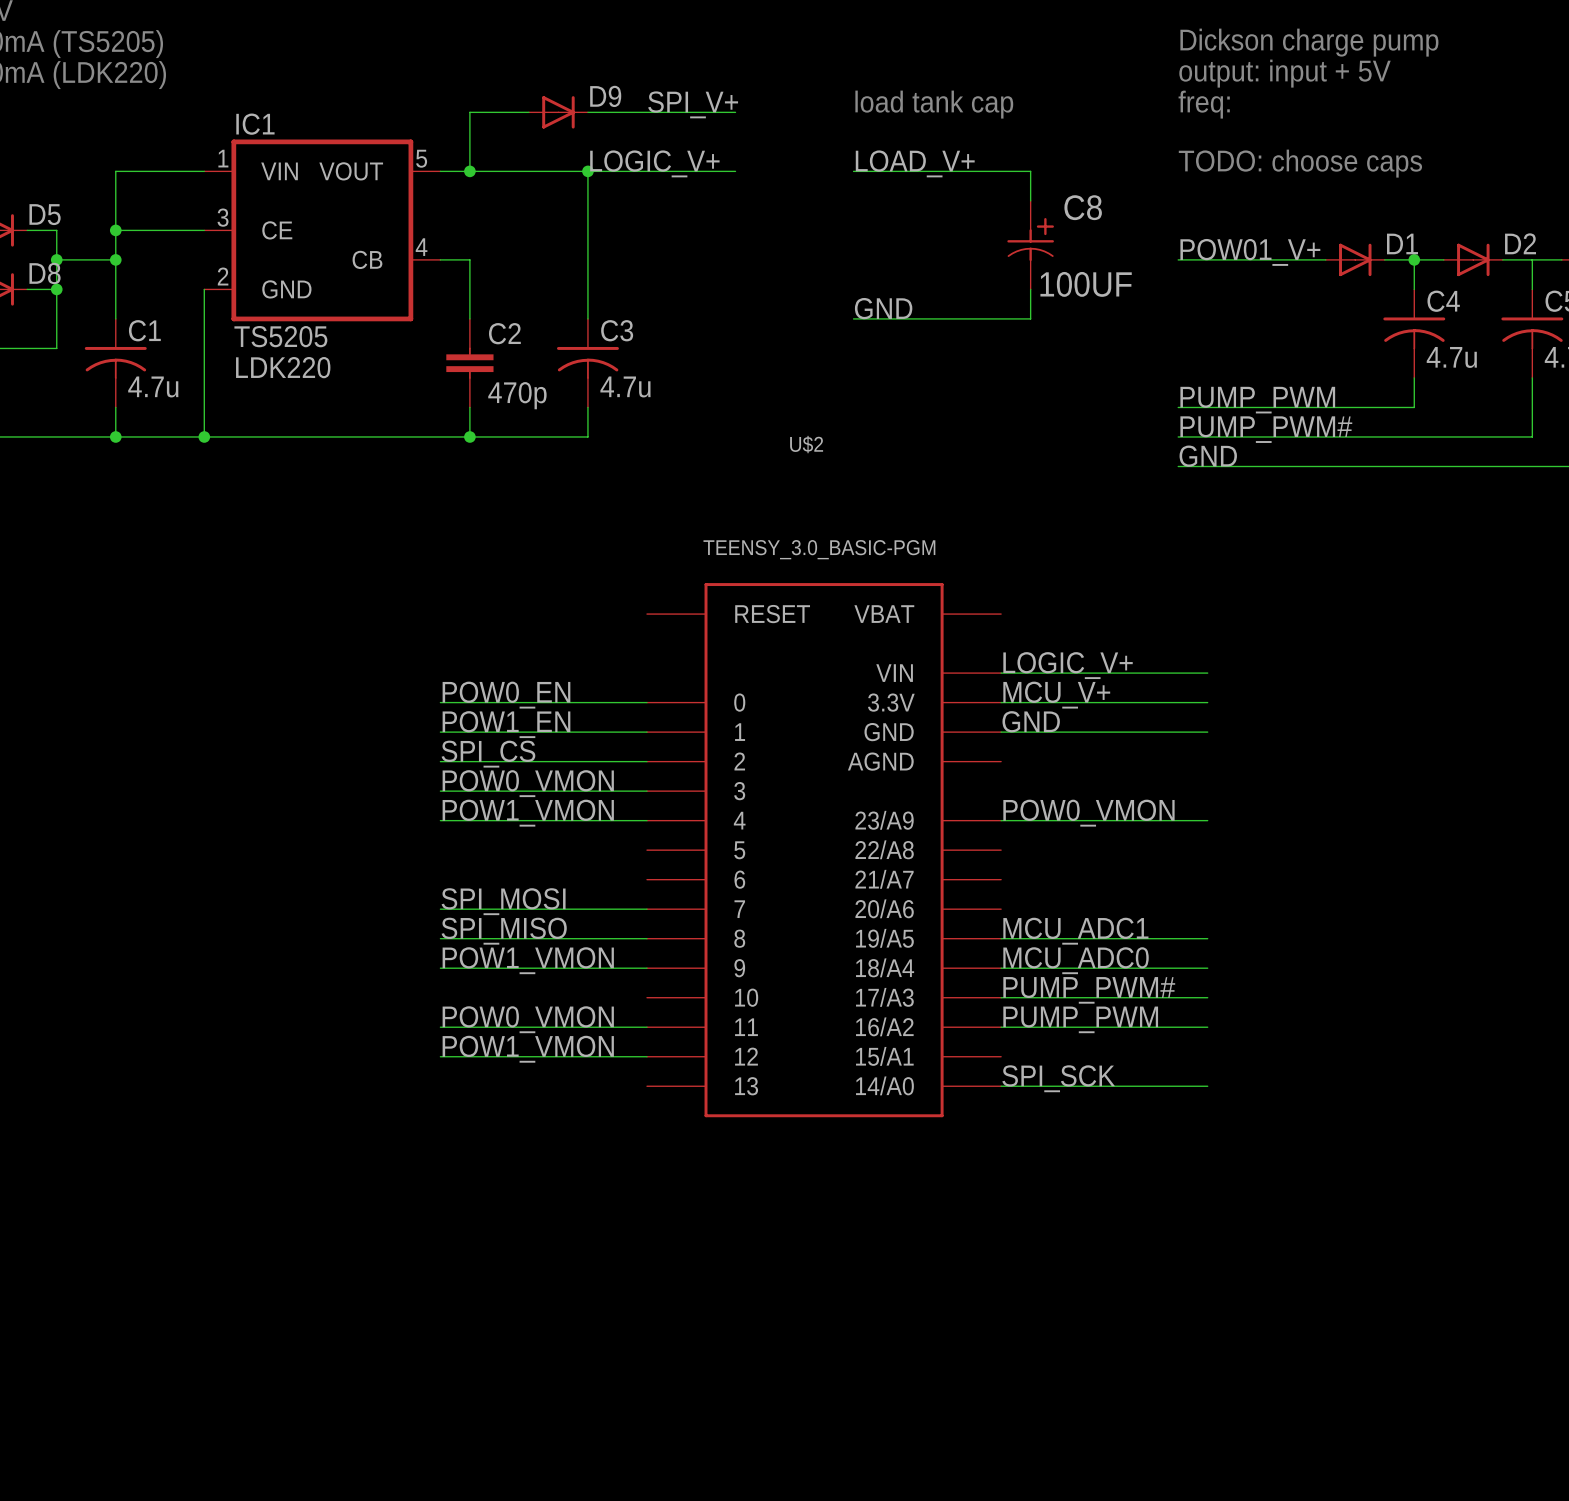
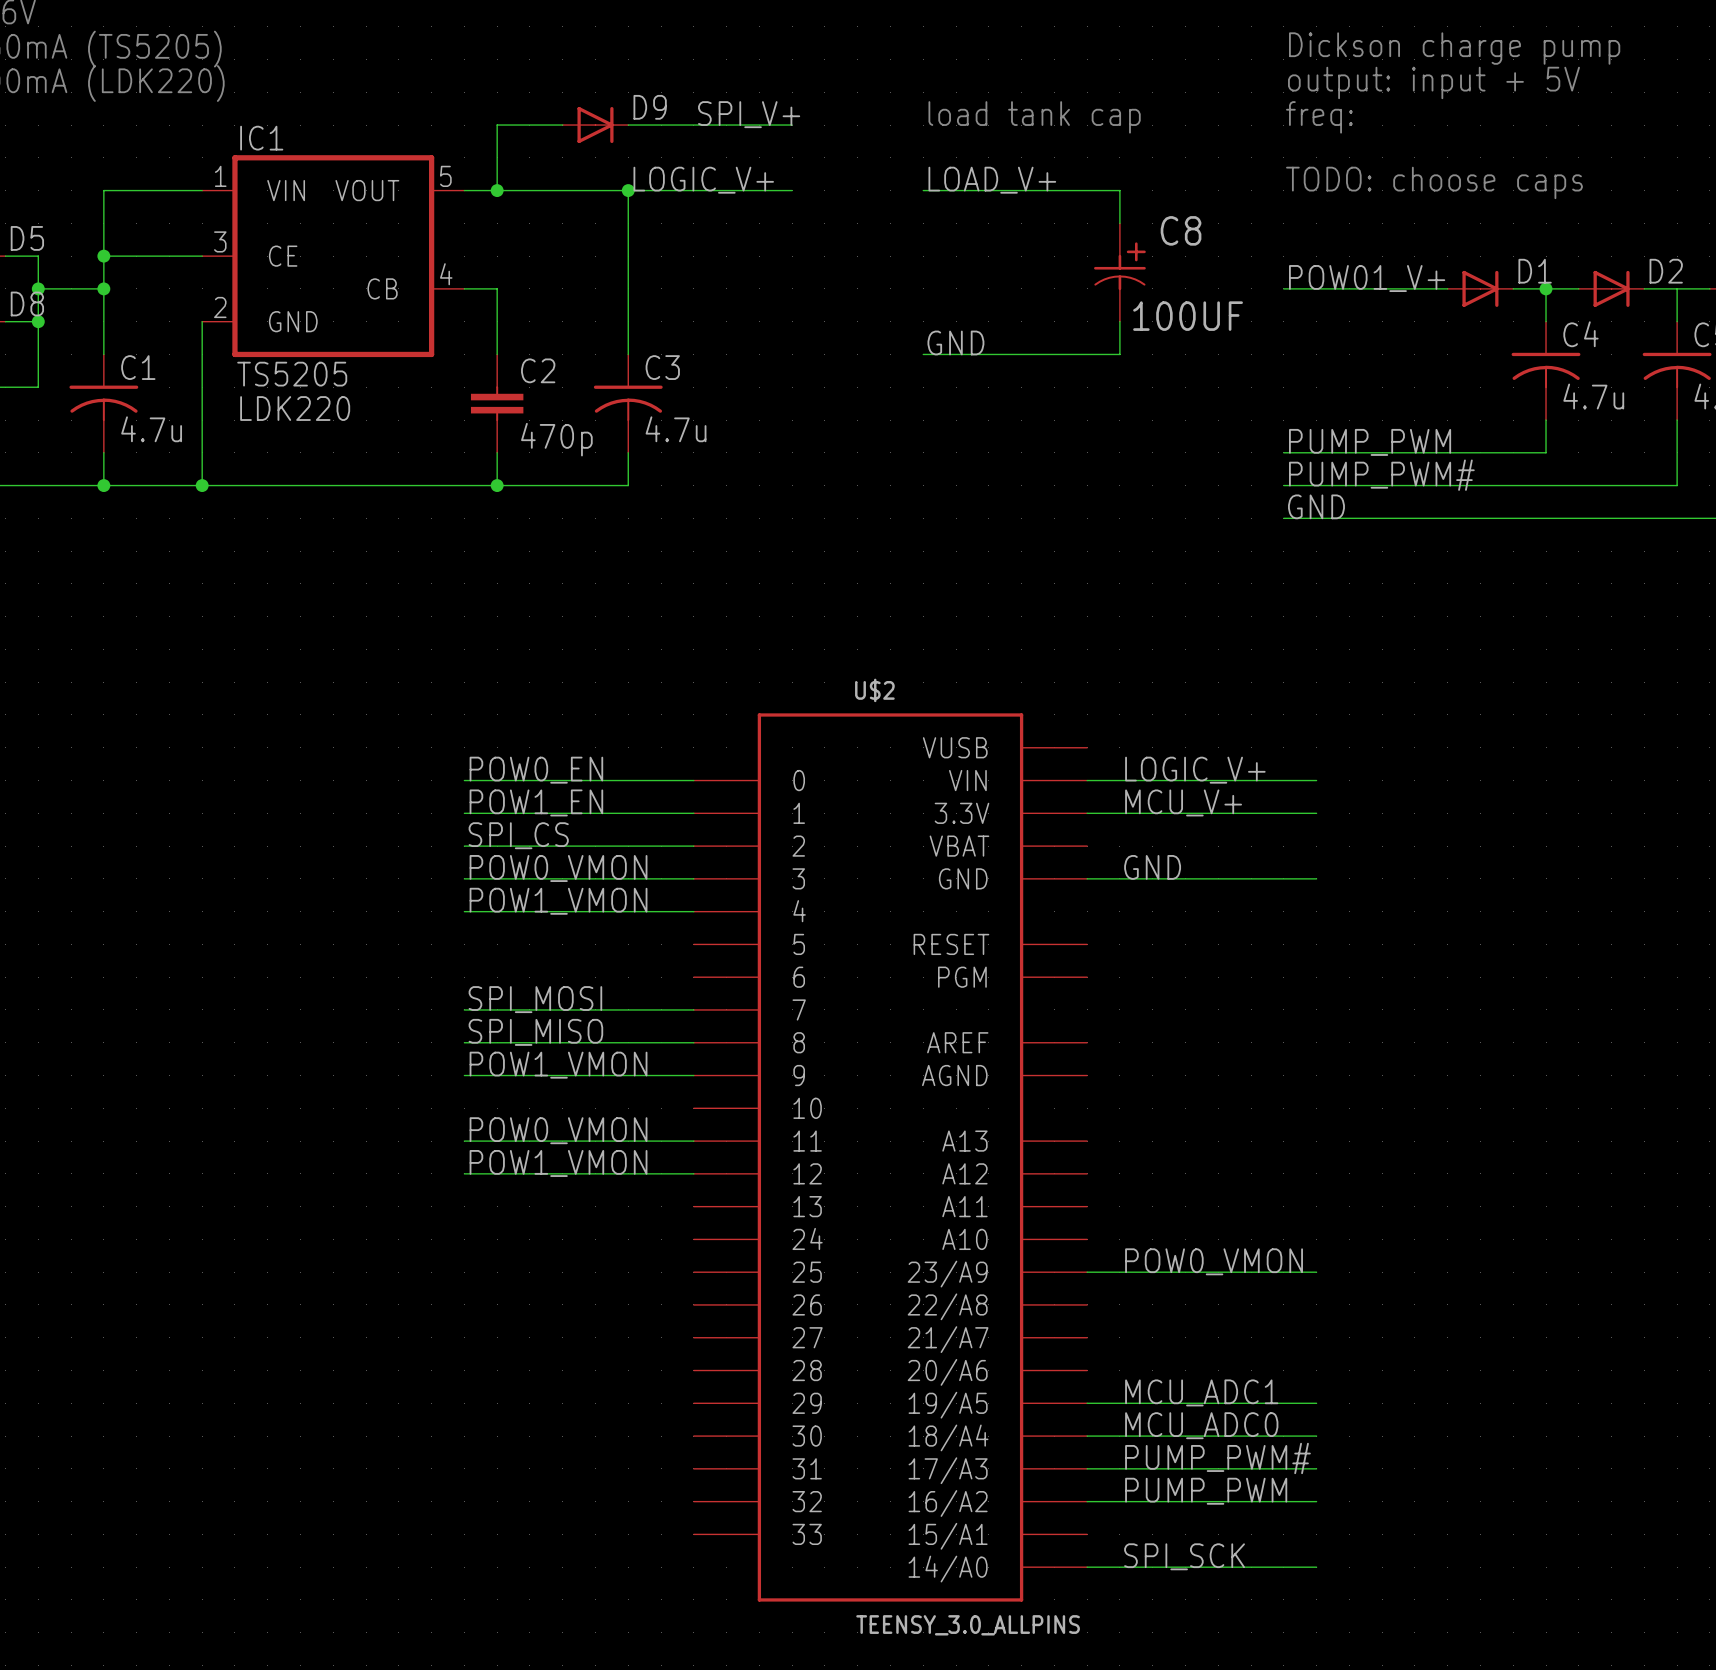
U$2 value: TEENSY_3.0_BASIC-PGM (819, 549) -> TEENSY_3.0_ALLPINS (968, 1625)
U$2 symbol: [646, 583, 1002, 1118] -> [693, 713, 1088, 1602]
label position: LOGIC_V+ (1068, 665) -> LOGIC_V+ (1195, 770)
wire: (1001, 673) (1207, 673) -> (1087, 878) (1316, 878)
label position: MCU_V+ (1056, 695) -> MCU_V+ (1183, 802)
label position: GND (1031, 721) -> GND (1152, 867)
label: POW0_VMON (1088, 813) -> none
wire: (1001, 820) (1207, 820) -> none
label: MCU_ADC1 (1075, 931) -> none
wire: (1001, 938) (1207, 938) -> none
label: MCU_ADC0 (1076, 960) -> none
wire: (1001, 968) (1207, 968) -> (1087, 1272) (1316, 1272)
label: PUMP_PWM# (1089, 990) -> none
wire: (1001, 997) (1207, 997) -> (1087, 1403) (1316, 1403)
label: PUMP_PWM (1080, 1019) -> none
wire: (1001, 1027) (1207, 1027) -> (1087, 1436) (1316, 1436)
label: SPI_SCK (1058, 1078) -> none
wire: (1001, 1086) (1207, 1086) -> (1087, 1501) (1316, 1501)
label: none -> POW0_VMON (1214, 1261)
label: none -> MCU_ADC1 (1201, 1392)
label: none -> MCU_ADC0 (1201, 1425)
label: none -> PUMP_PWM# (1217, 1458)
wire: none -> (1087, 1468) (1316, 1468)
label: none -> PUMP_PWM (1206, 1491)
label: none -> SPI_SCK (1184, 1556)
wire: none -> (1087, 1567) (1316, 1567)

